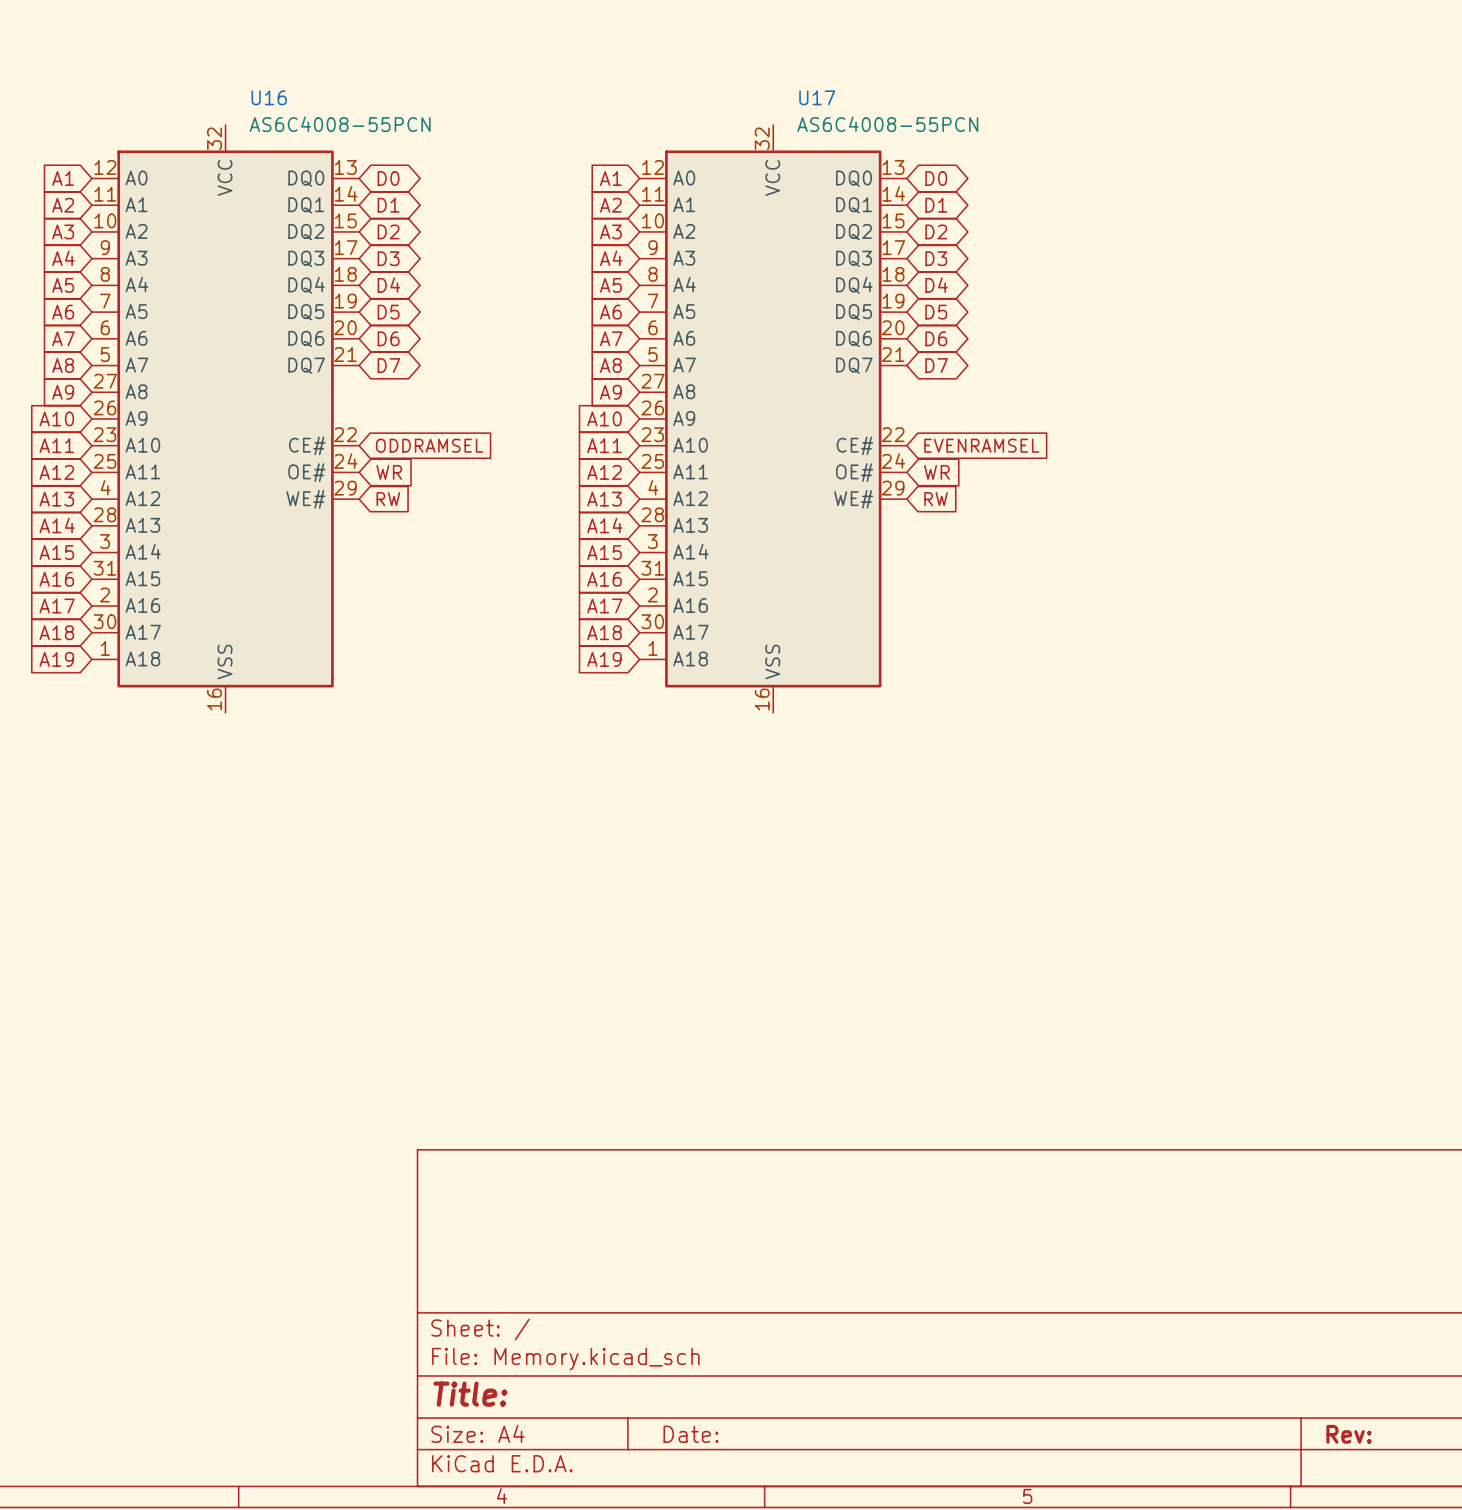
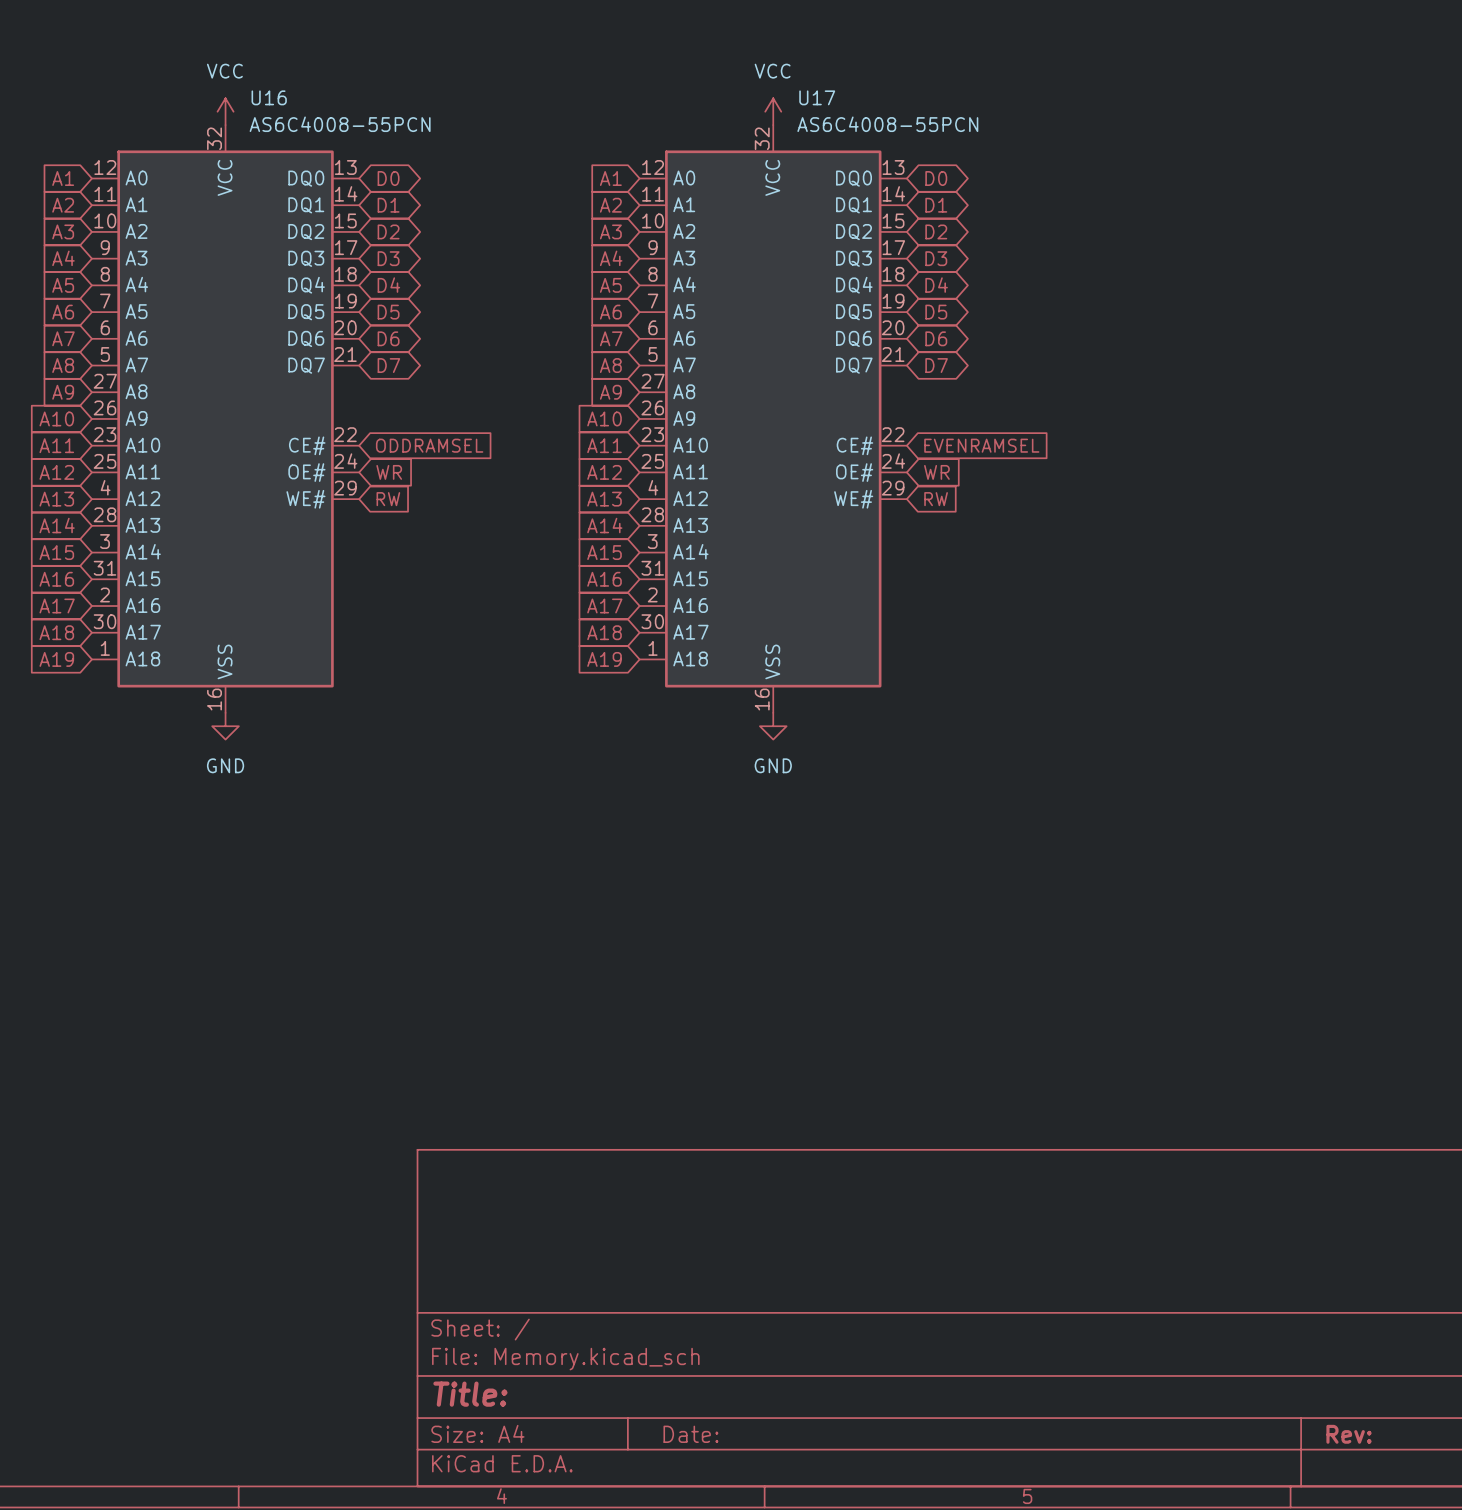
power symbol: none -> VCC (225, 111)
power symbol: none -> VCC (773, 111)
power symbol: none -> GND (225, 726)
power symbol: none -> GND (773, 726)

